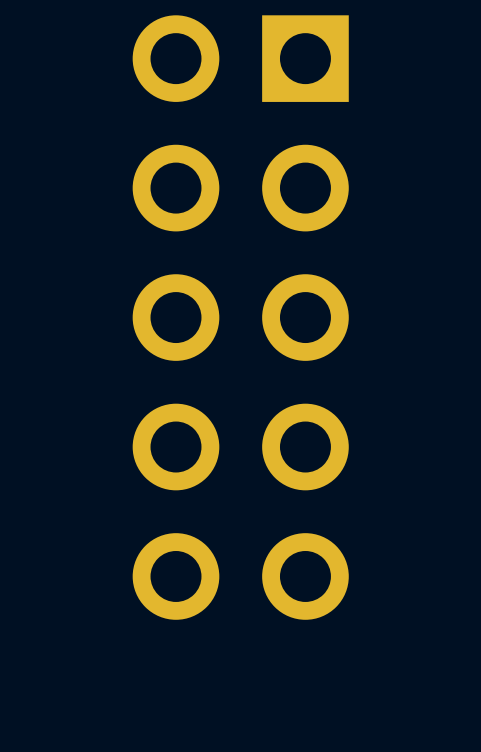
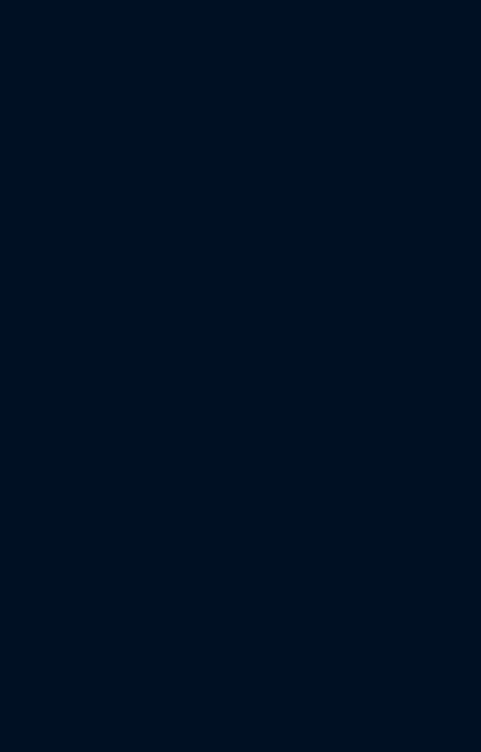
part: (240, 317) -> none

